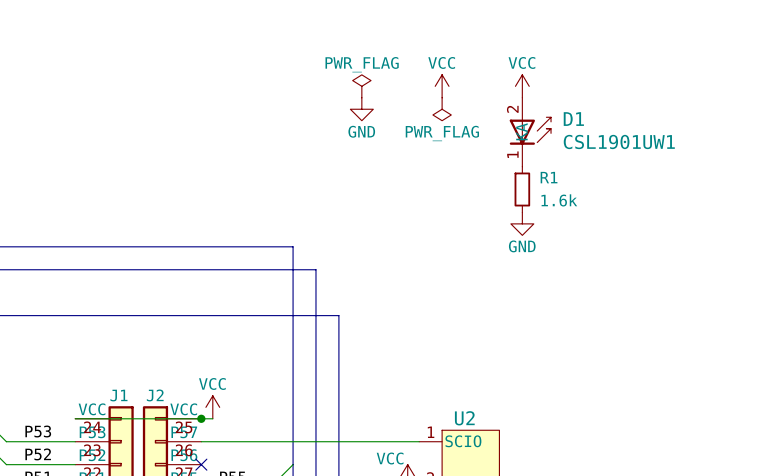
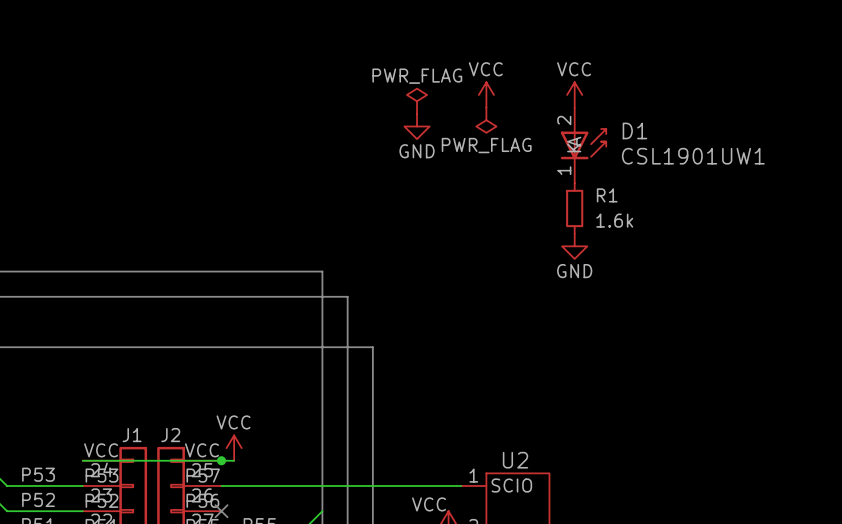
power symbol position: PWR_FLAG (361, 86) -> PWR_FLAG (417, 101)
power symbol position: GND (361, 109) -> GND (417, 126)

